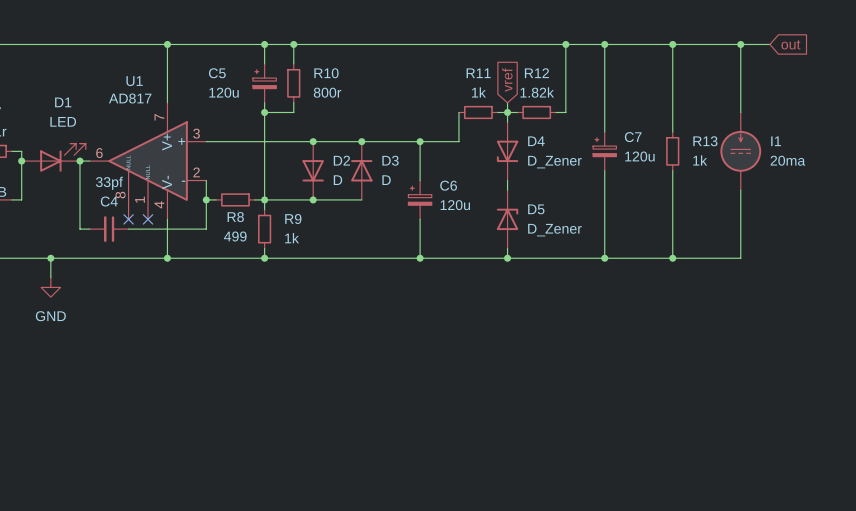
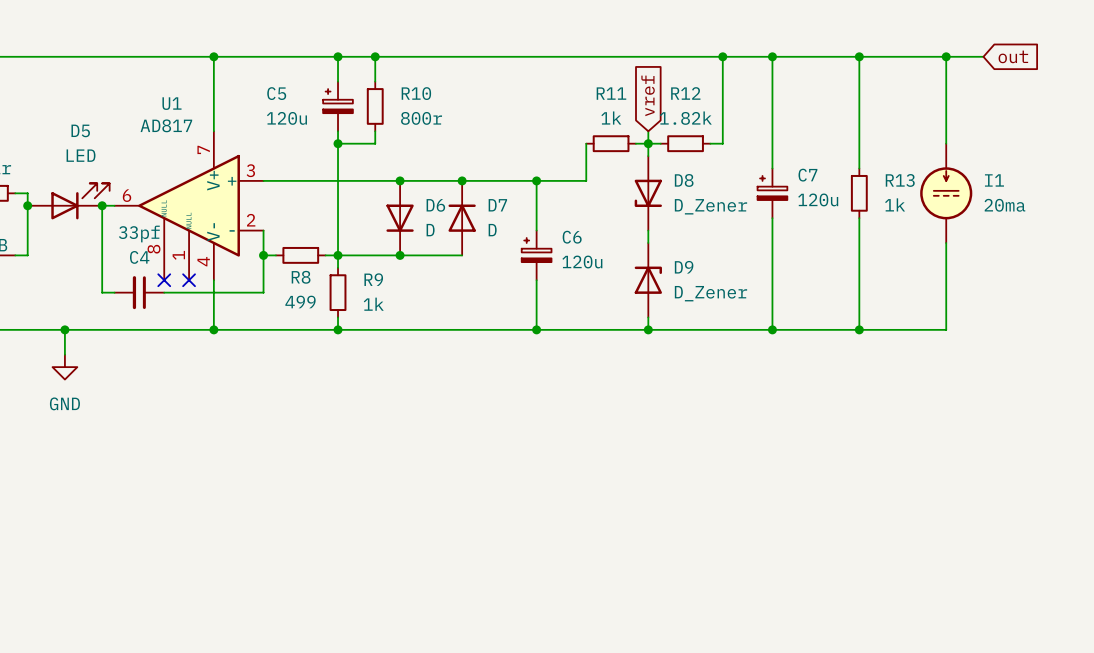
D1 name: D1 (63, 102) -> D5 (80, 130)
D4 name: D4 (536, 141) -> D8 (684, 180)
D2 name: D2 (341, 160) -> D6 (435, 205)
D3 name: D3 (390, 160) -> D7 (497, 205)
D5 name: D5 (536, 209) -> D9 (684, 267)

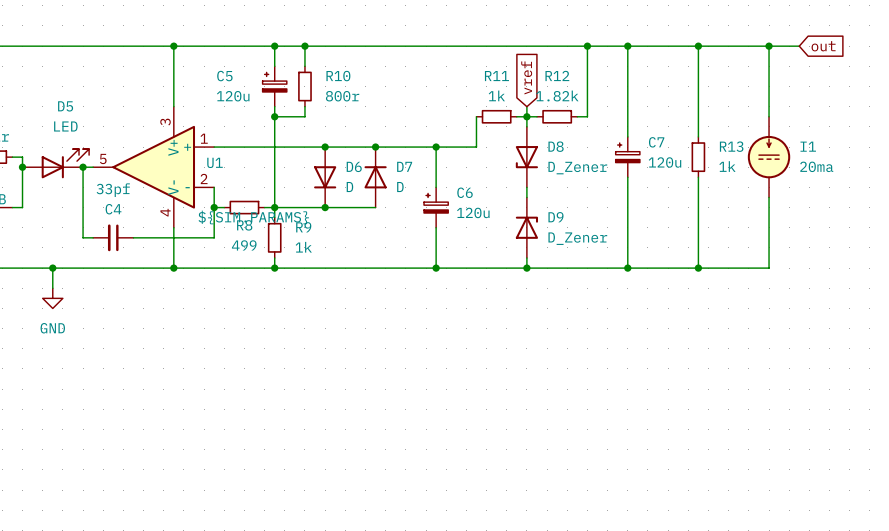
U1 name position: U1 (171, 103) -> U1 (215, 162)
U1 value: AD817 (166, 125) -> ${SIM.PARAMS} (253, 217)
U1 symbol: [114, 131, 264, 281] -> [93, 106, 215, 228]
no-connect mark: (164, 280) -> none
no-connect mark: (189, 280) -> none

